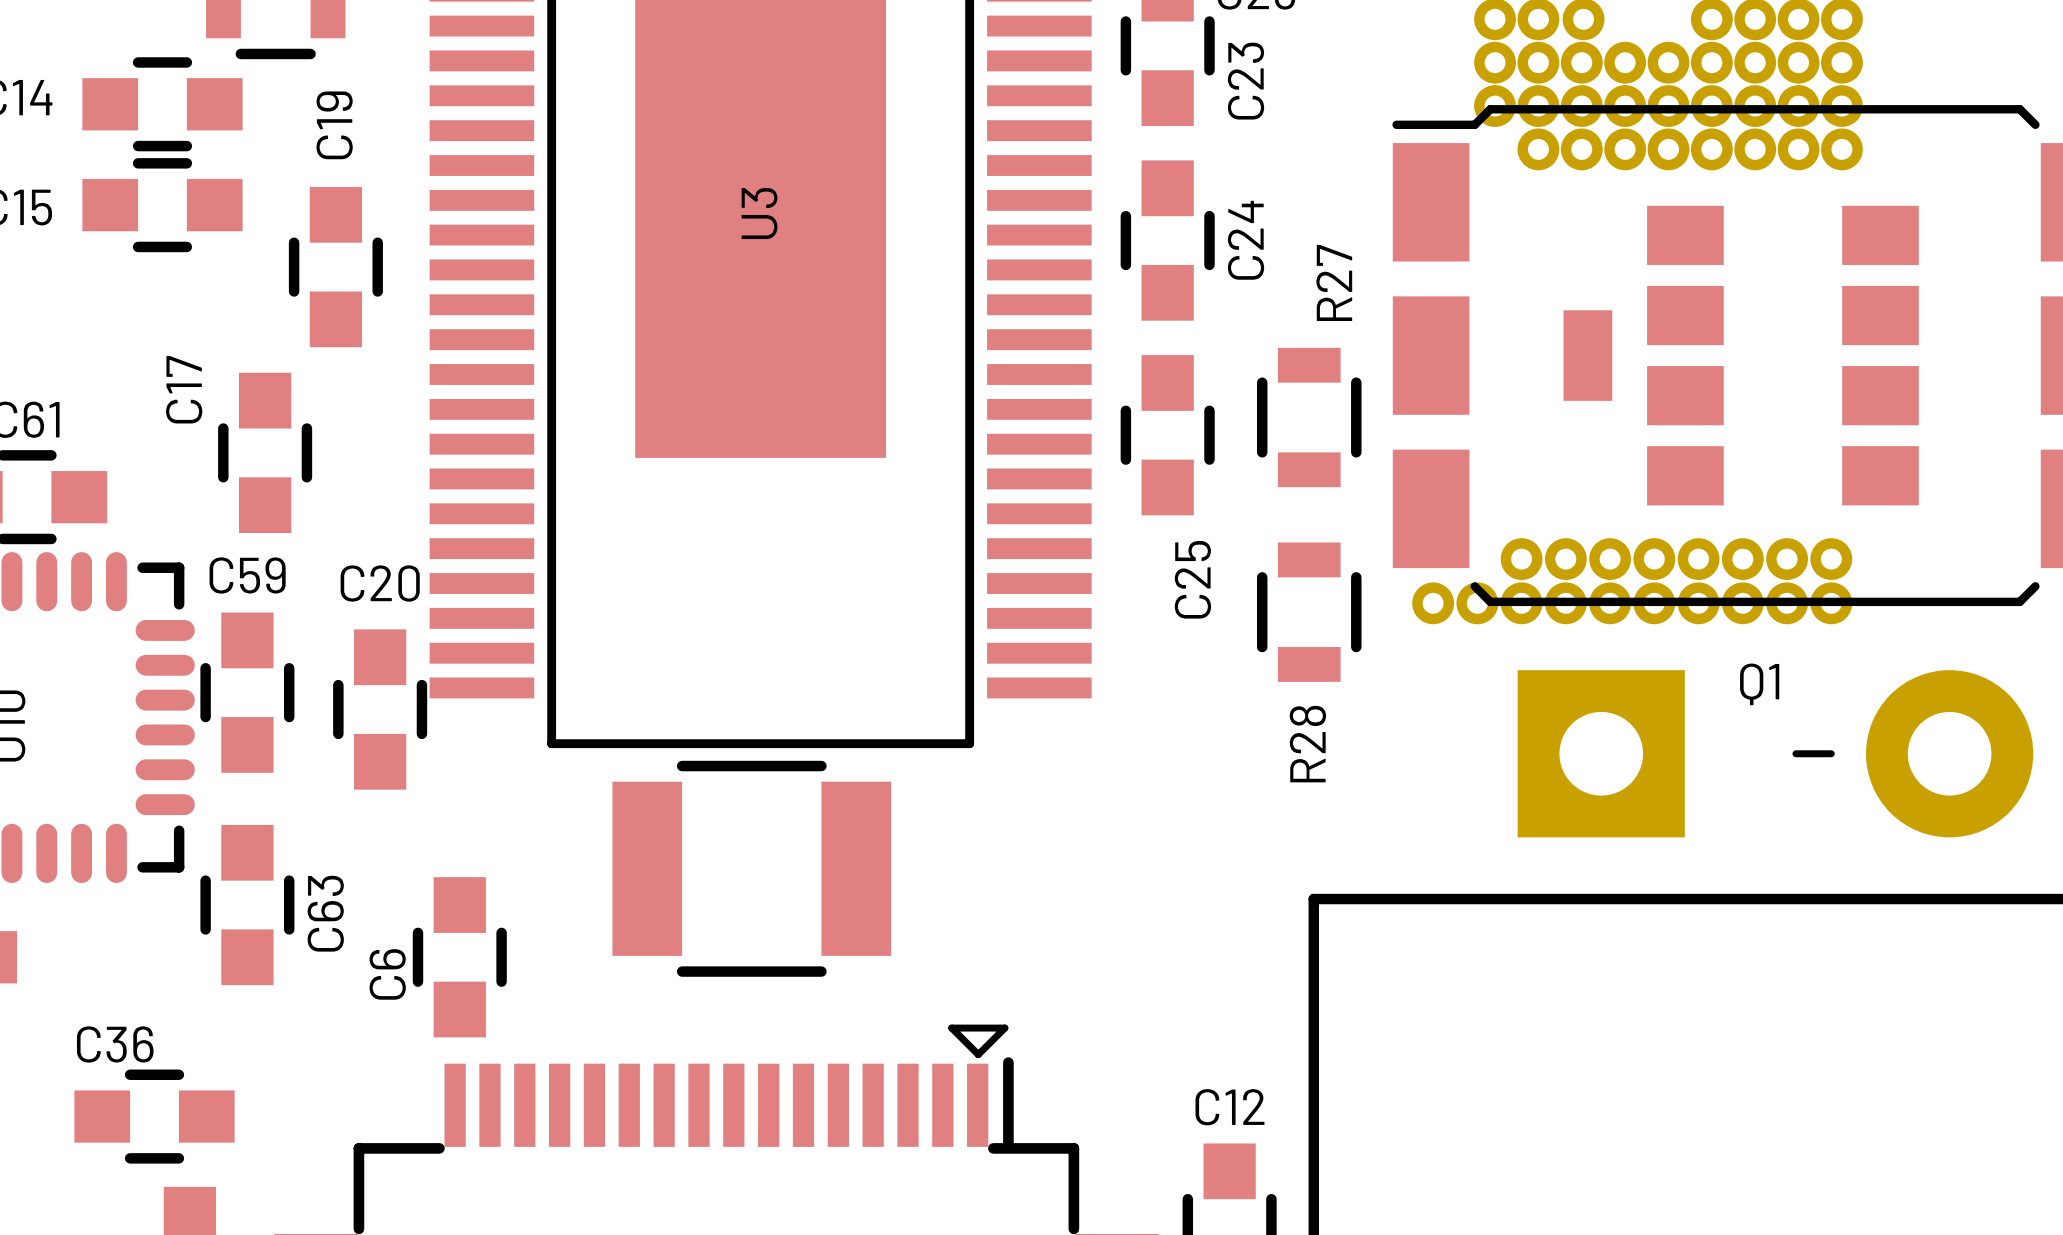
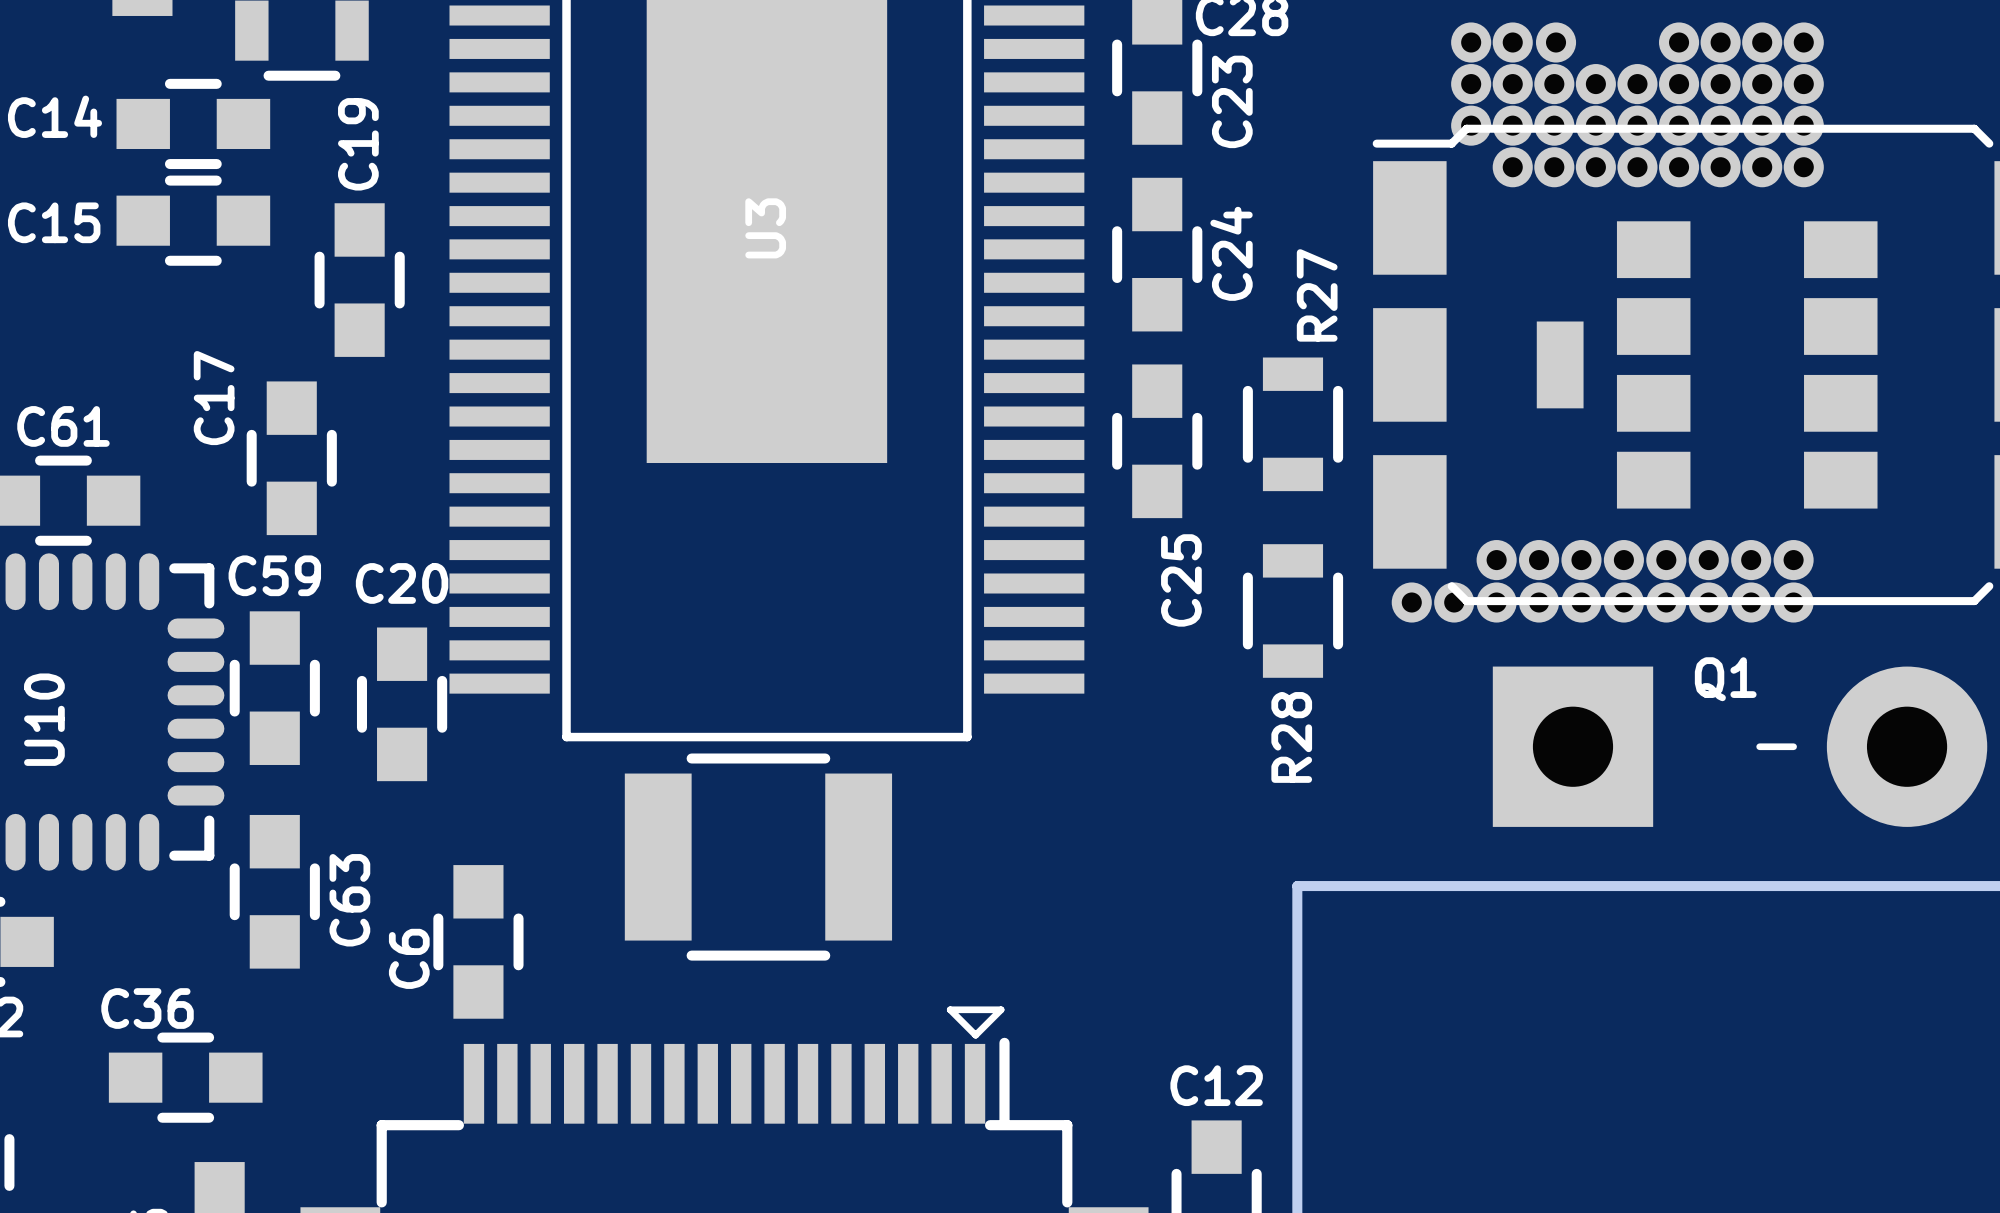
C36 position: (154, 1116) -> (185, 1077)

